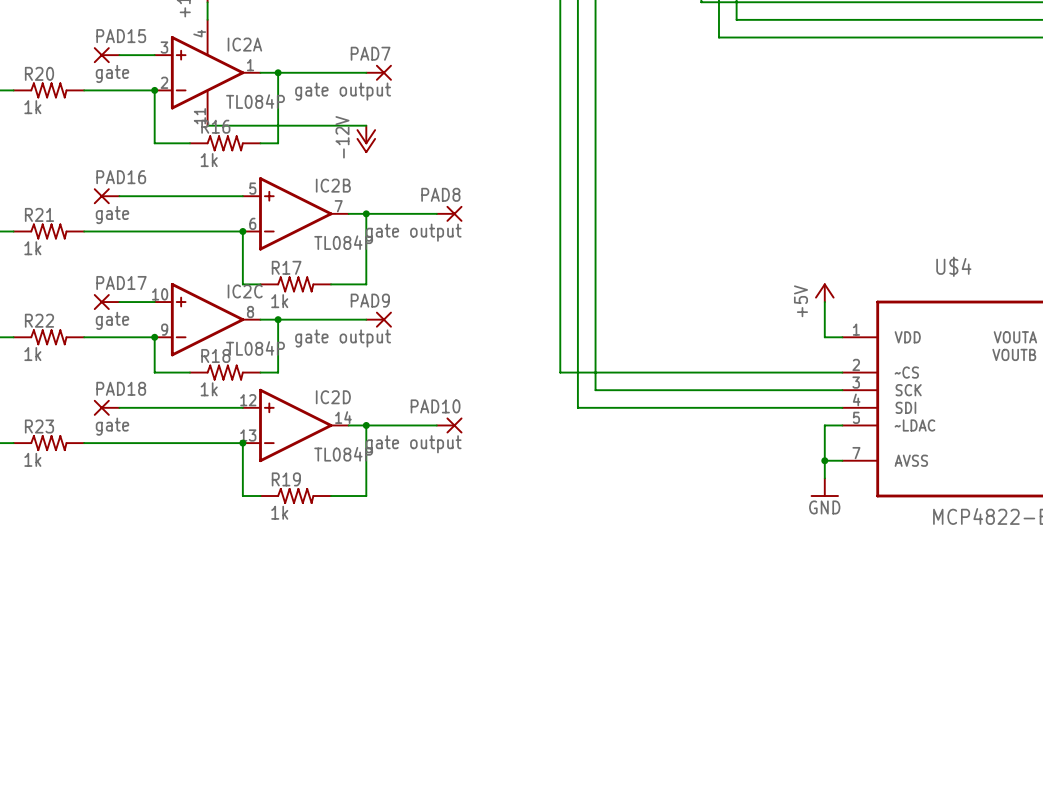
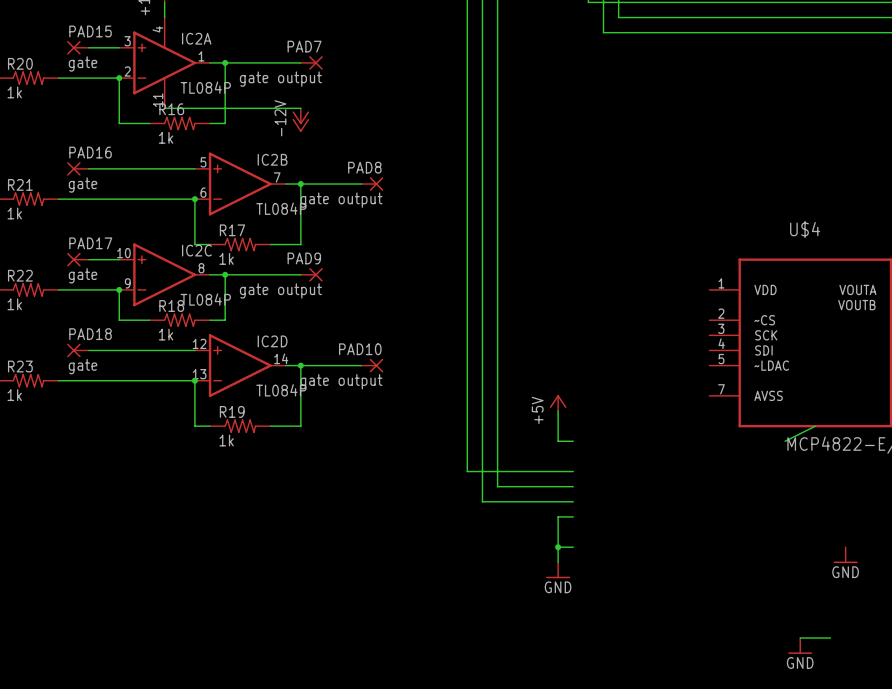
power symbol: +5V (824, 292) -> none
wire: (824, 302) (824, 337) (842, 337) -> none
wire: (560, 372) (842, 372) -> (467, 320) (467, 471) (573, 471)
wire: (595, 390) (842, 390) -> (497, 335) (497, 486) (573, 486)
wire: (577, 407) (842, 407) -> (482, 350) (482, 501) (573, 501)
wire: (842, 425) (824, 425) (824, 478) -> none
wire: (824, 460) (842, 460) -> none
junction: (824, 460) -> none
power symbol: none -> +5V (558, 403)
wire: none -> (558, 411) (558, 441) (573, 441)
power symbol: GND (824, 487) -> none
wire: none -> (815, 426) (785, 441)
wire: none -> (573, 516) (558, 516) (558, 562)
wire: none -> (558, 547) (573, 547)
junction: none -> (558, 547)
power symbol: none -> GND (845, 555)
power symbol: none -> GND (558, 570)
wire: none -> (800, 638) (830, 638)
power symbol: none -> GND (800, 645)

